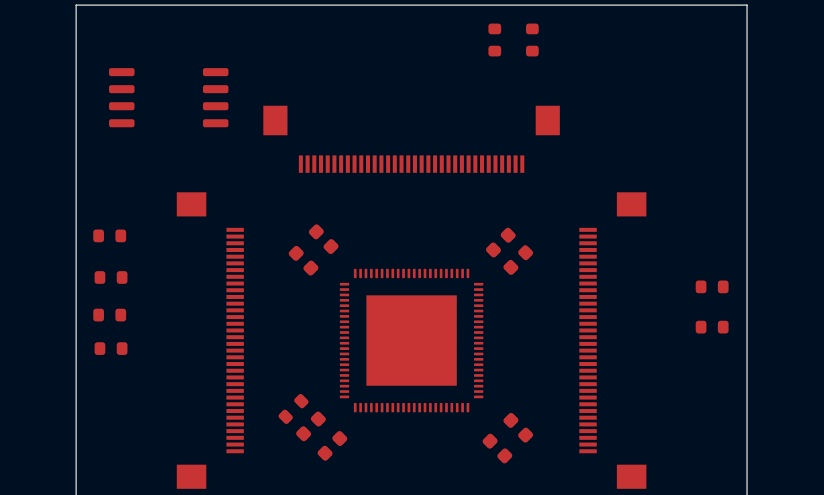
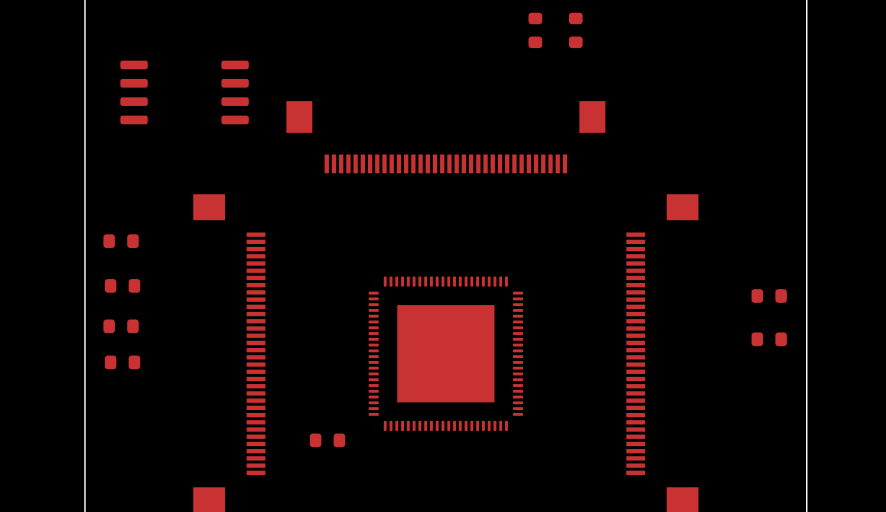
part: (323, 239) -> none
part: (500, 242) -> none
part: (303, 260) -> none
part: (518, 260) -> none
part: (293, 408) -> none
part: none -> (327, 440)
part: (310, 426) -> none
part: (518, 427) -> none
part: (332, 445) -> none
part: (497, 448) -> none

